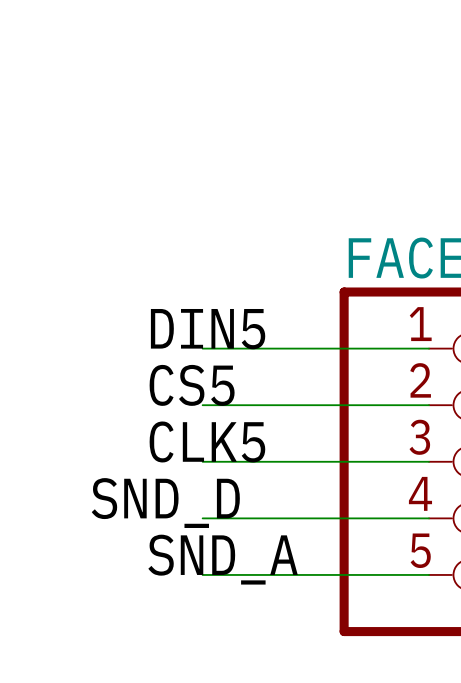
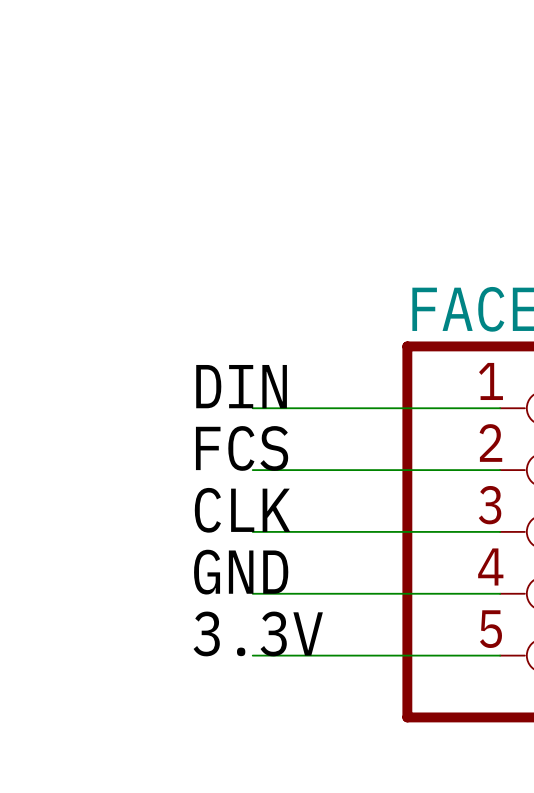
label: DIN5 (208, 329) -> DIN (241, 386)
label: CS5 (192, 385) -> FCS (242, 448)
label: CLK5 (207, 441) -> CLK (242, 510)
label: none -> GND (241, 572)
label: SND_D (165, 503) -> none
label: SND_A (223, 559) -> 3.3V (258, 633)

